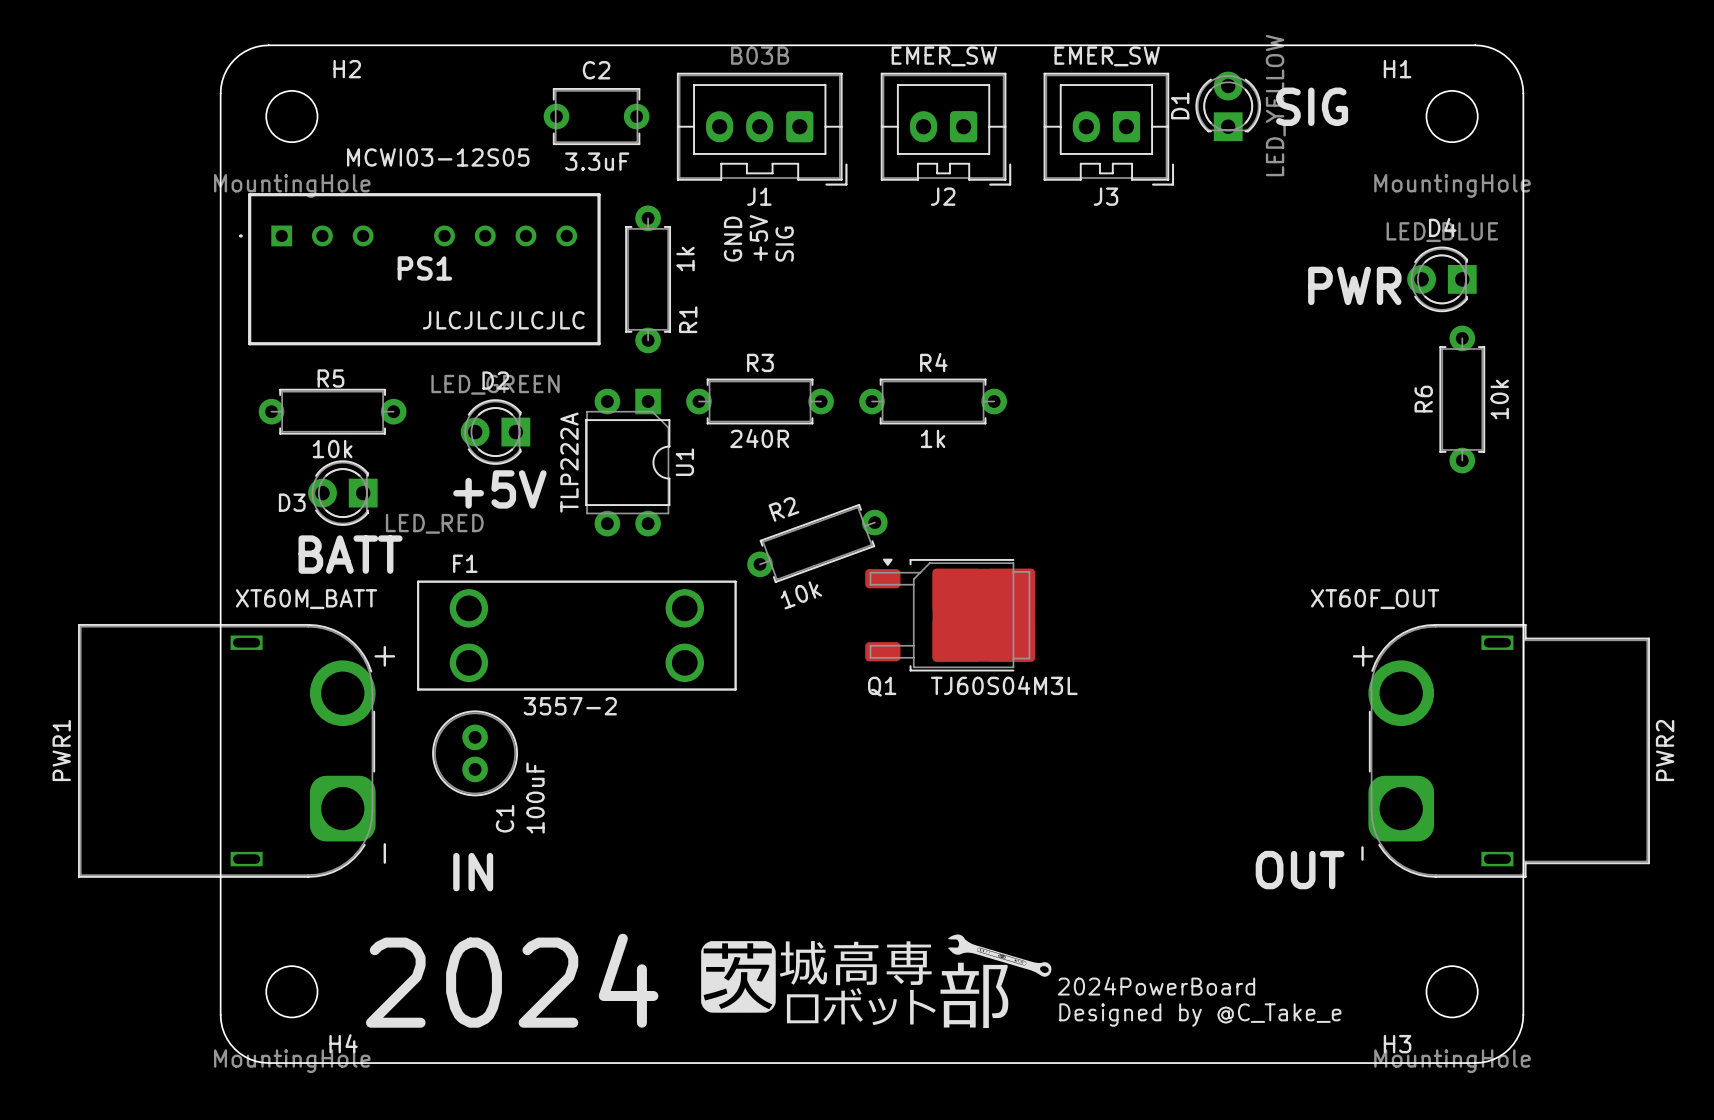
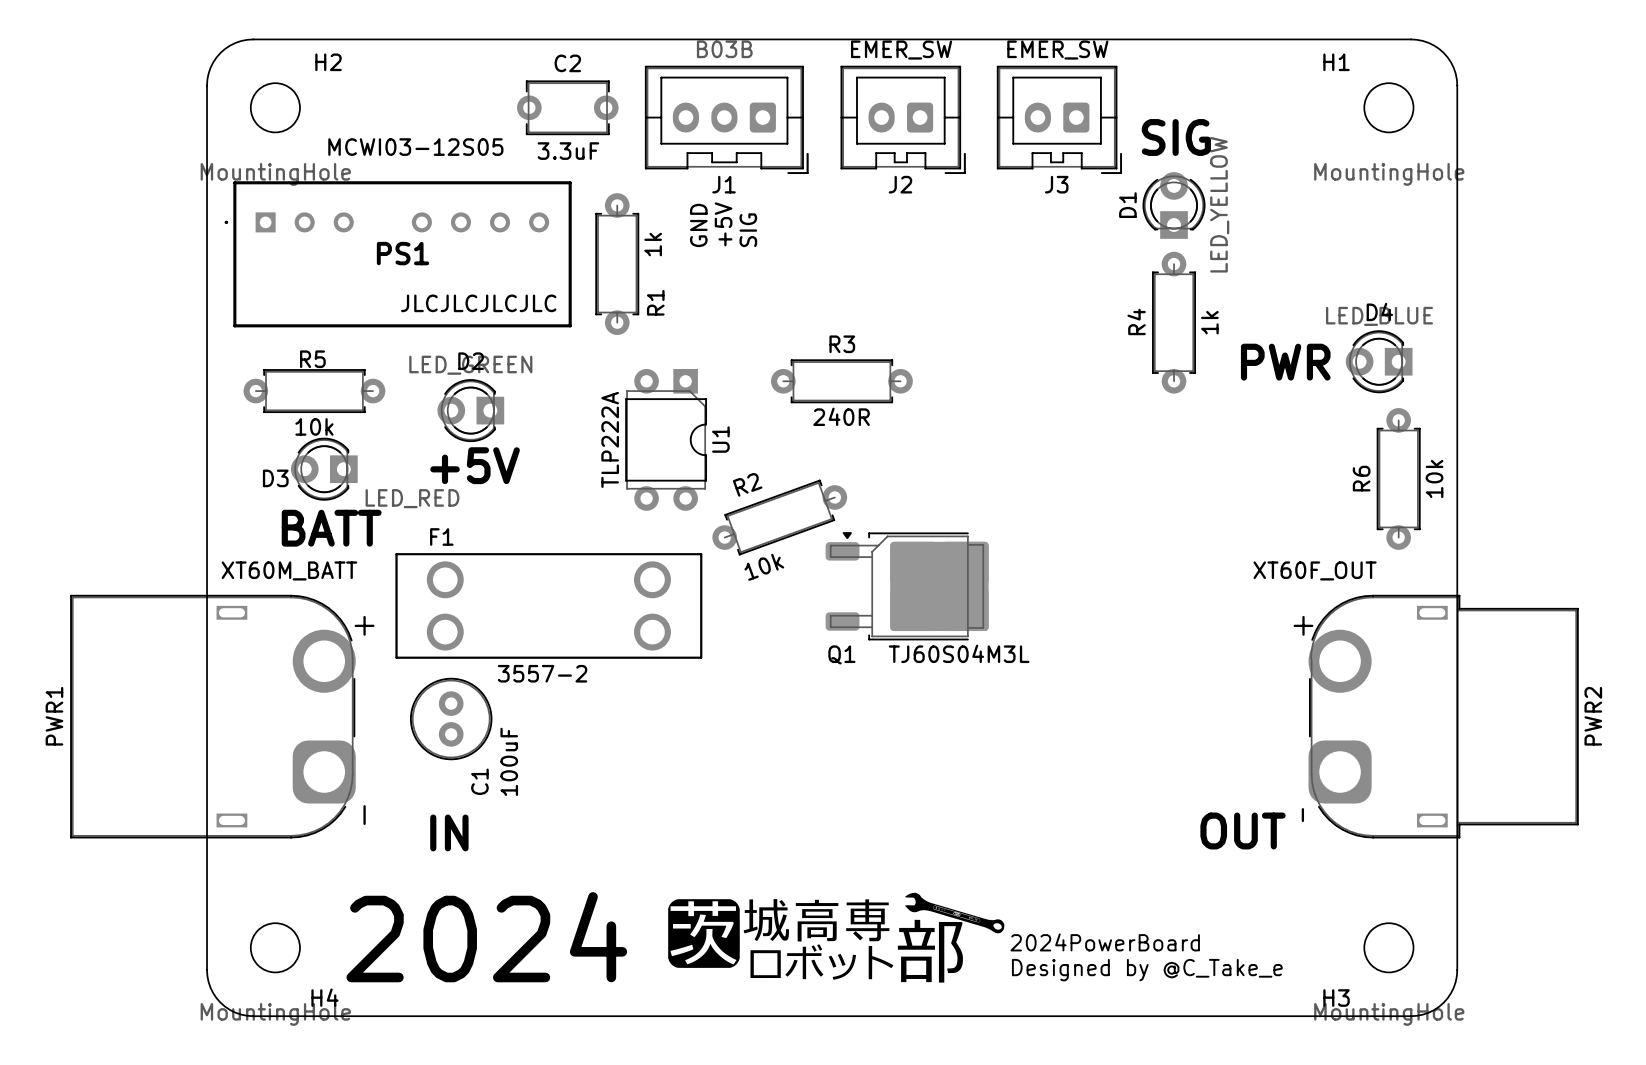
D1 position: (1228, 106) -> (1174, 205)
text position: SIG (1312, 106) -> SIG (1176, 137)
D4 position: (1441, 279) -> (1379, 361)
text position: PWR (1354, 285) -> PWR (1285, 362)
R4 name position: R4 (933, 362) -> R4 (1136, 321)
R6 position: (1462, 399) -> (1398, 478)
R3 position: (760, 401) -> (841, 381)
R4 rotation: 0° (933, 401) -> 90° clockwise (1174, 322)
R4 position: (933, 401) -> (1174, 322)
R4 value position: 1k (933, 438) -> 1k (1209, 322)
U1 position: (627, 462) -> (666, 439)

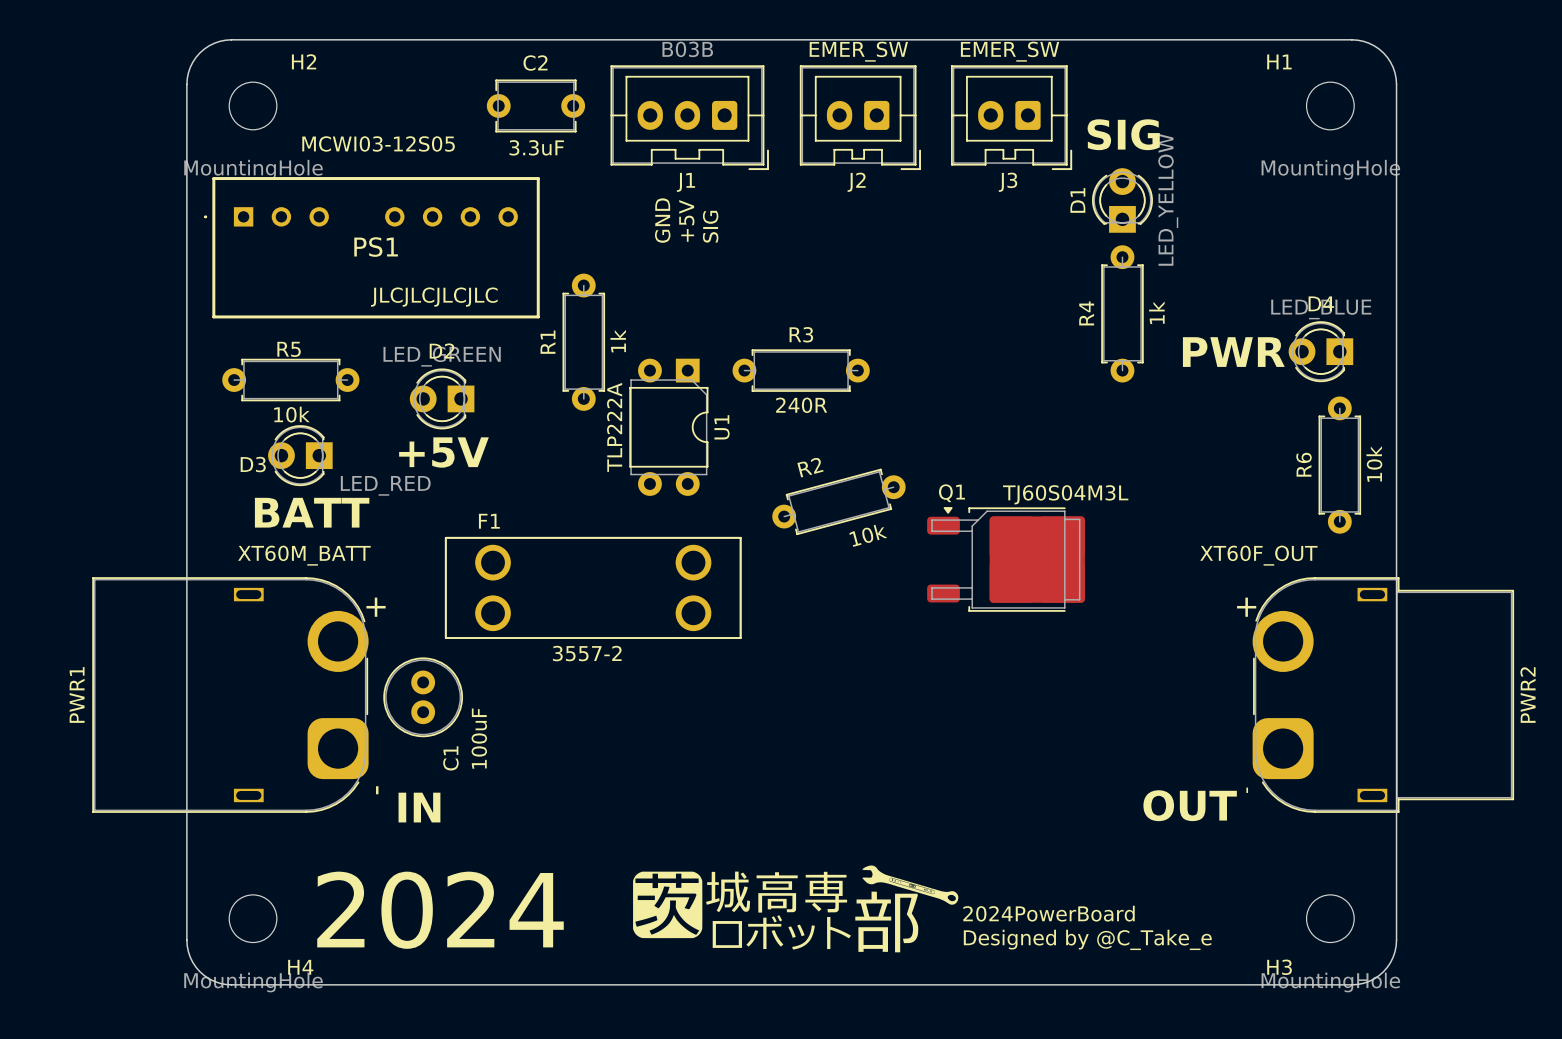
R1 value position: 1k (653, 244) -> 1k (618, 341)
R1 position: (617, 264) -> (583, 342)
R1 name position: R1 (655, 302) -> R1 (547, 342)
U1 position: (666, 439) -> (668, 427)
R2 rotation: 0° (779, 517) -> 5° clockwise (838, 501)
R2 position: (779, 517) -> (838, 501)
R2 value position: 10k (764, 567) -> 10k (868, 535)
Q1 position: (907, 586) -> (1006, 559)
F1 position: (548, 605) -> (593, 587)
Q1 value position: TJ60S04M3L (959, 653) -> TJ60S04M3L (1065, 494)
Q1 name position: Q1 (841, 654) -> Q1 (952, 493)
PWR1 position: (212, 716) -> (230, 695)

